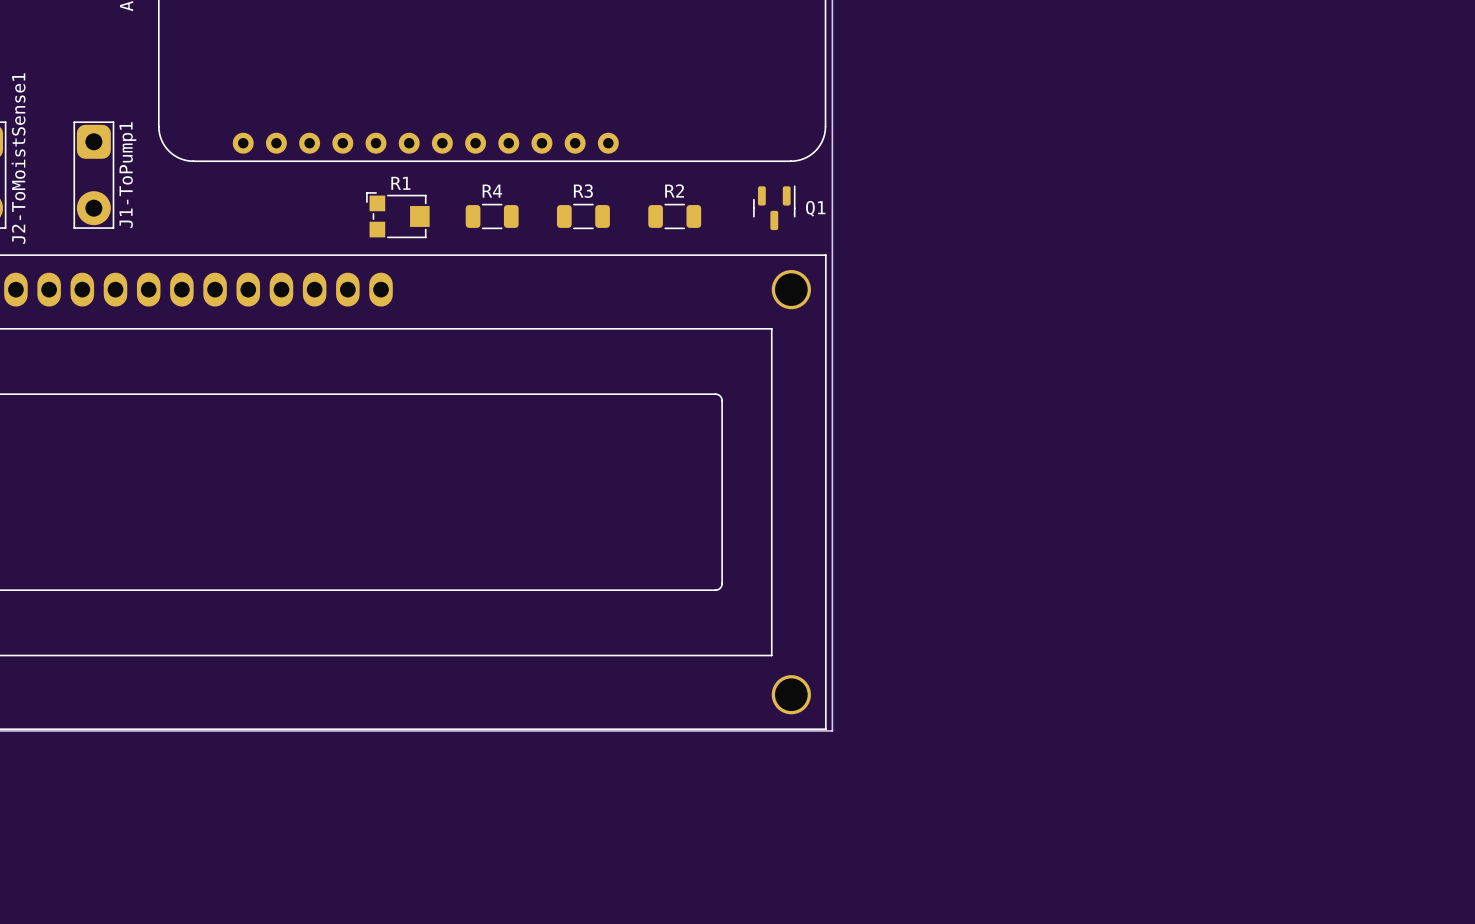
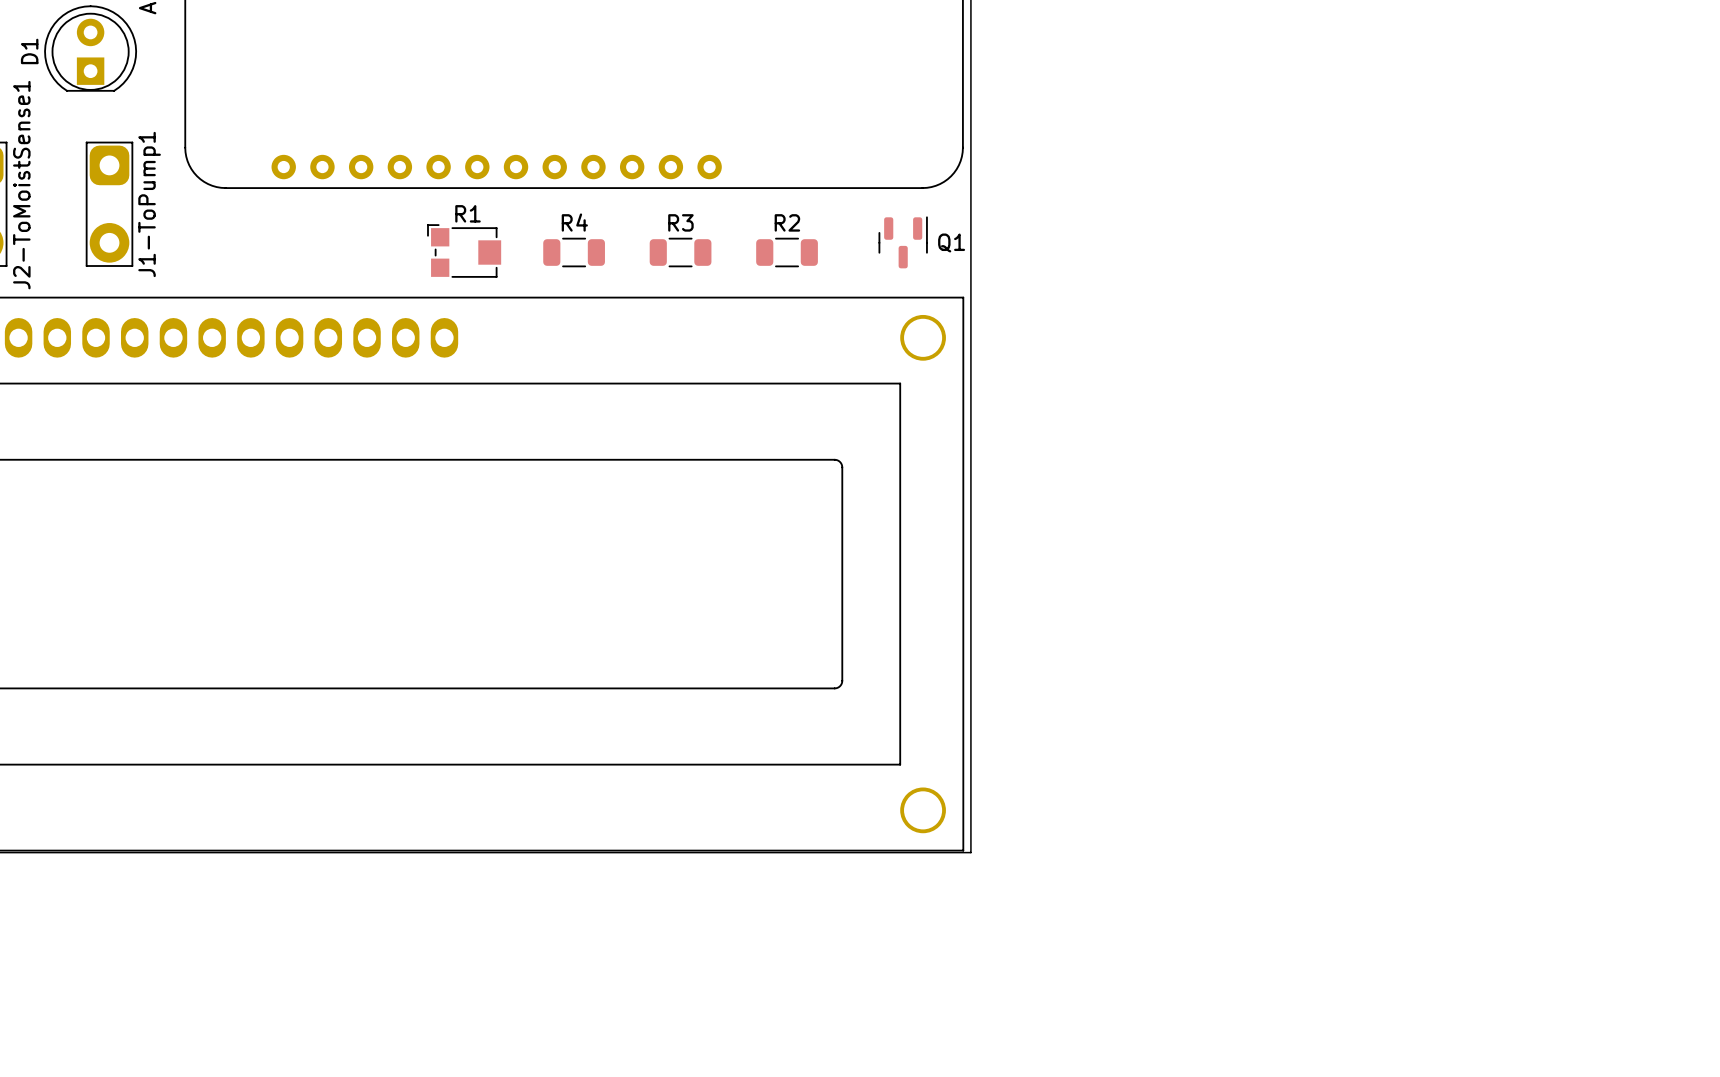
D1: none -> (90, 48)

